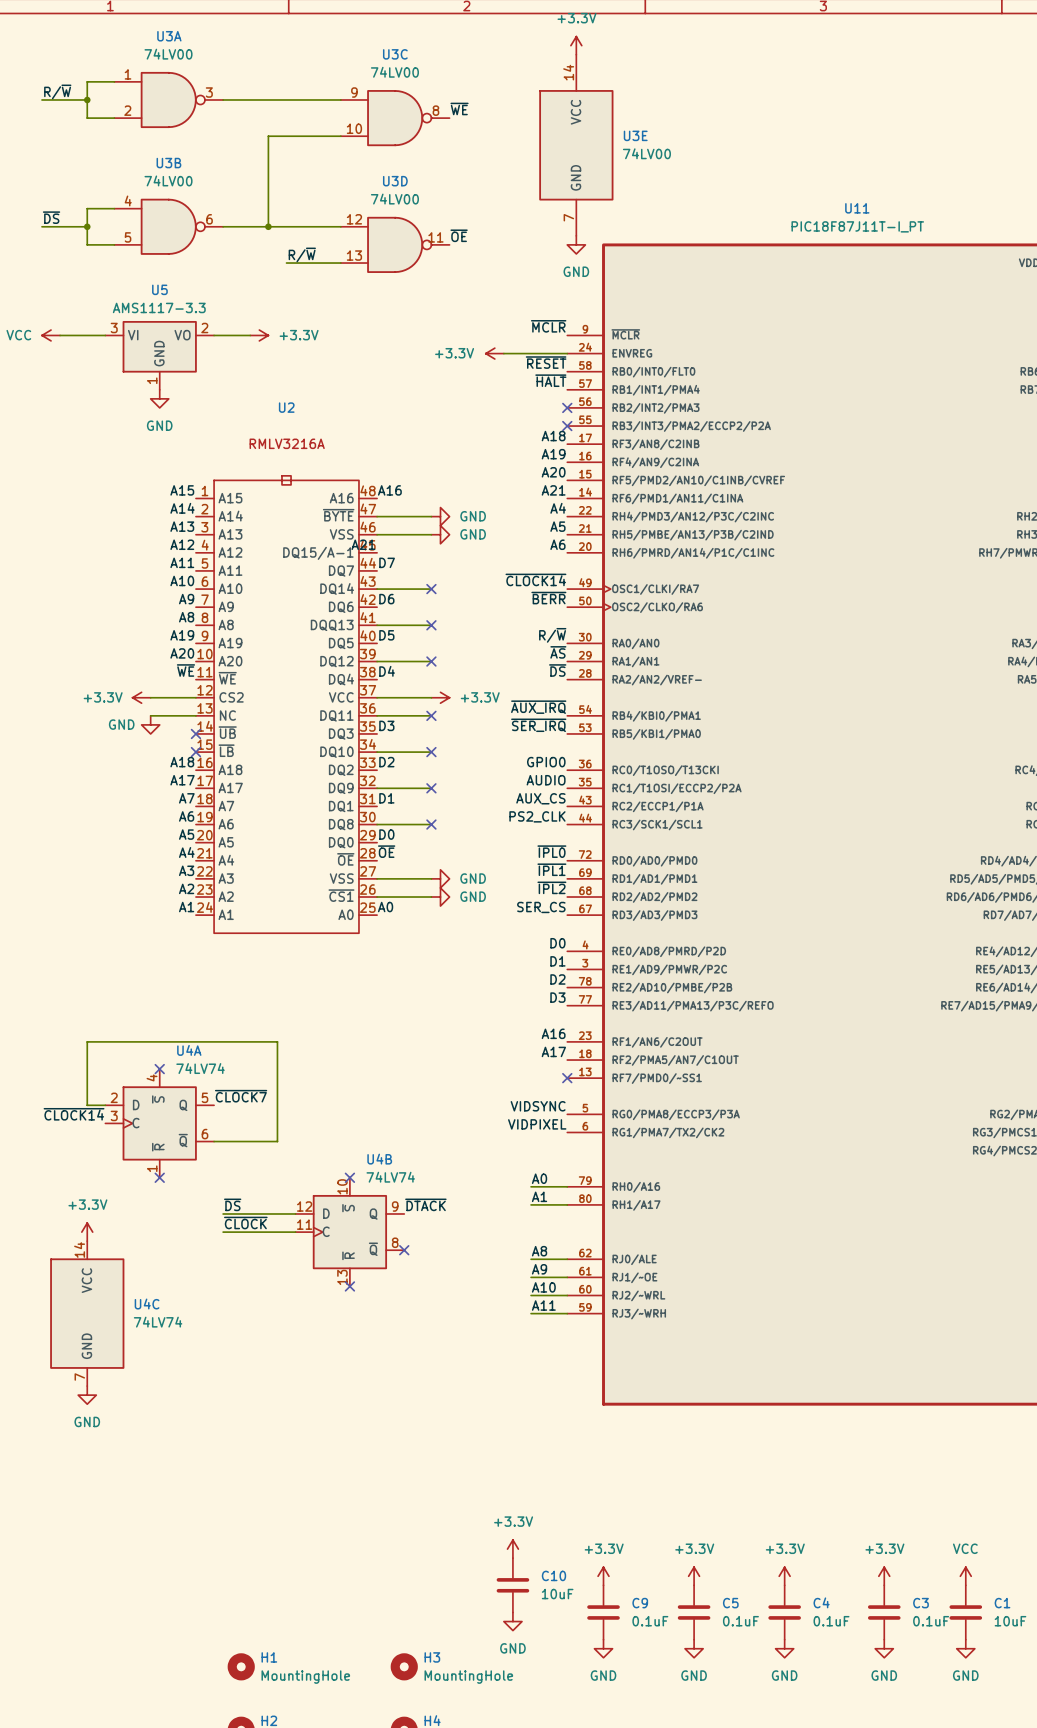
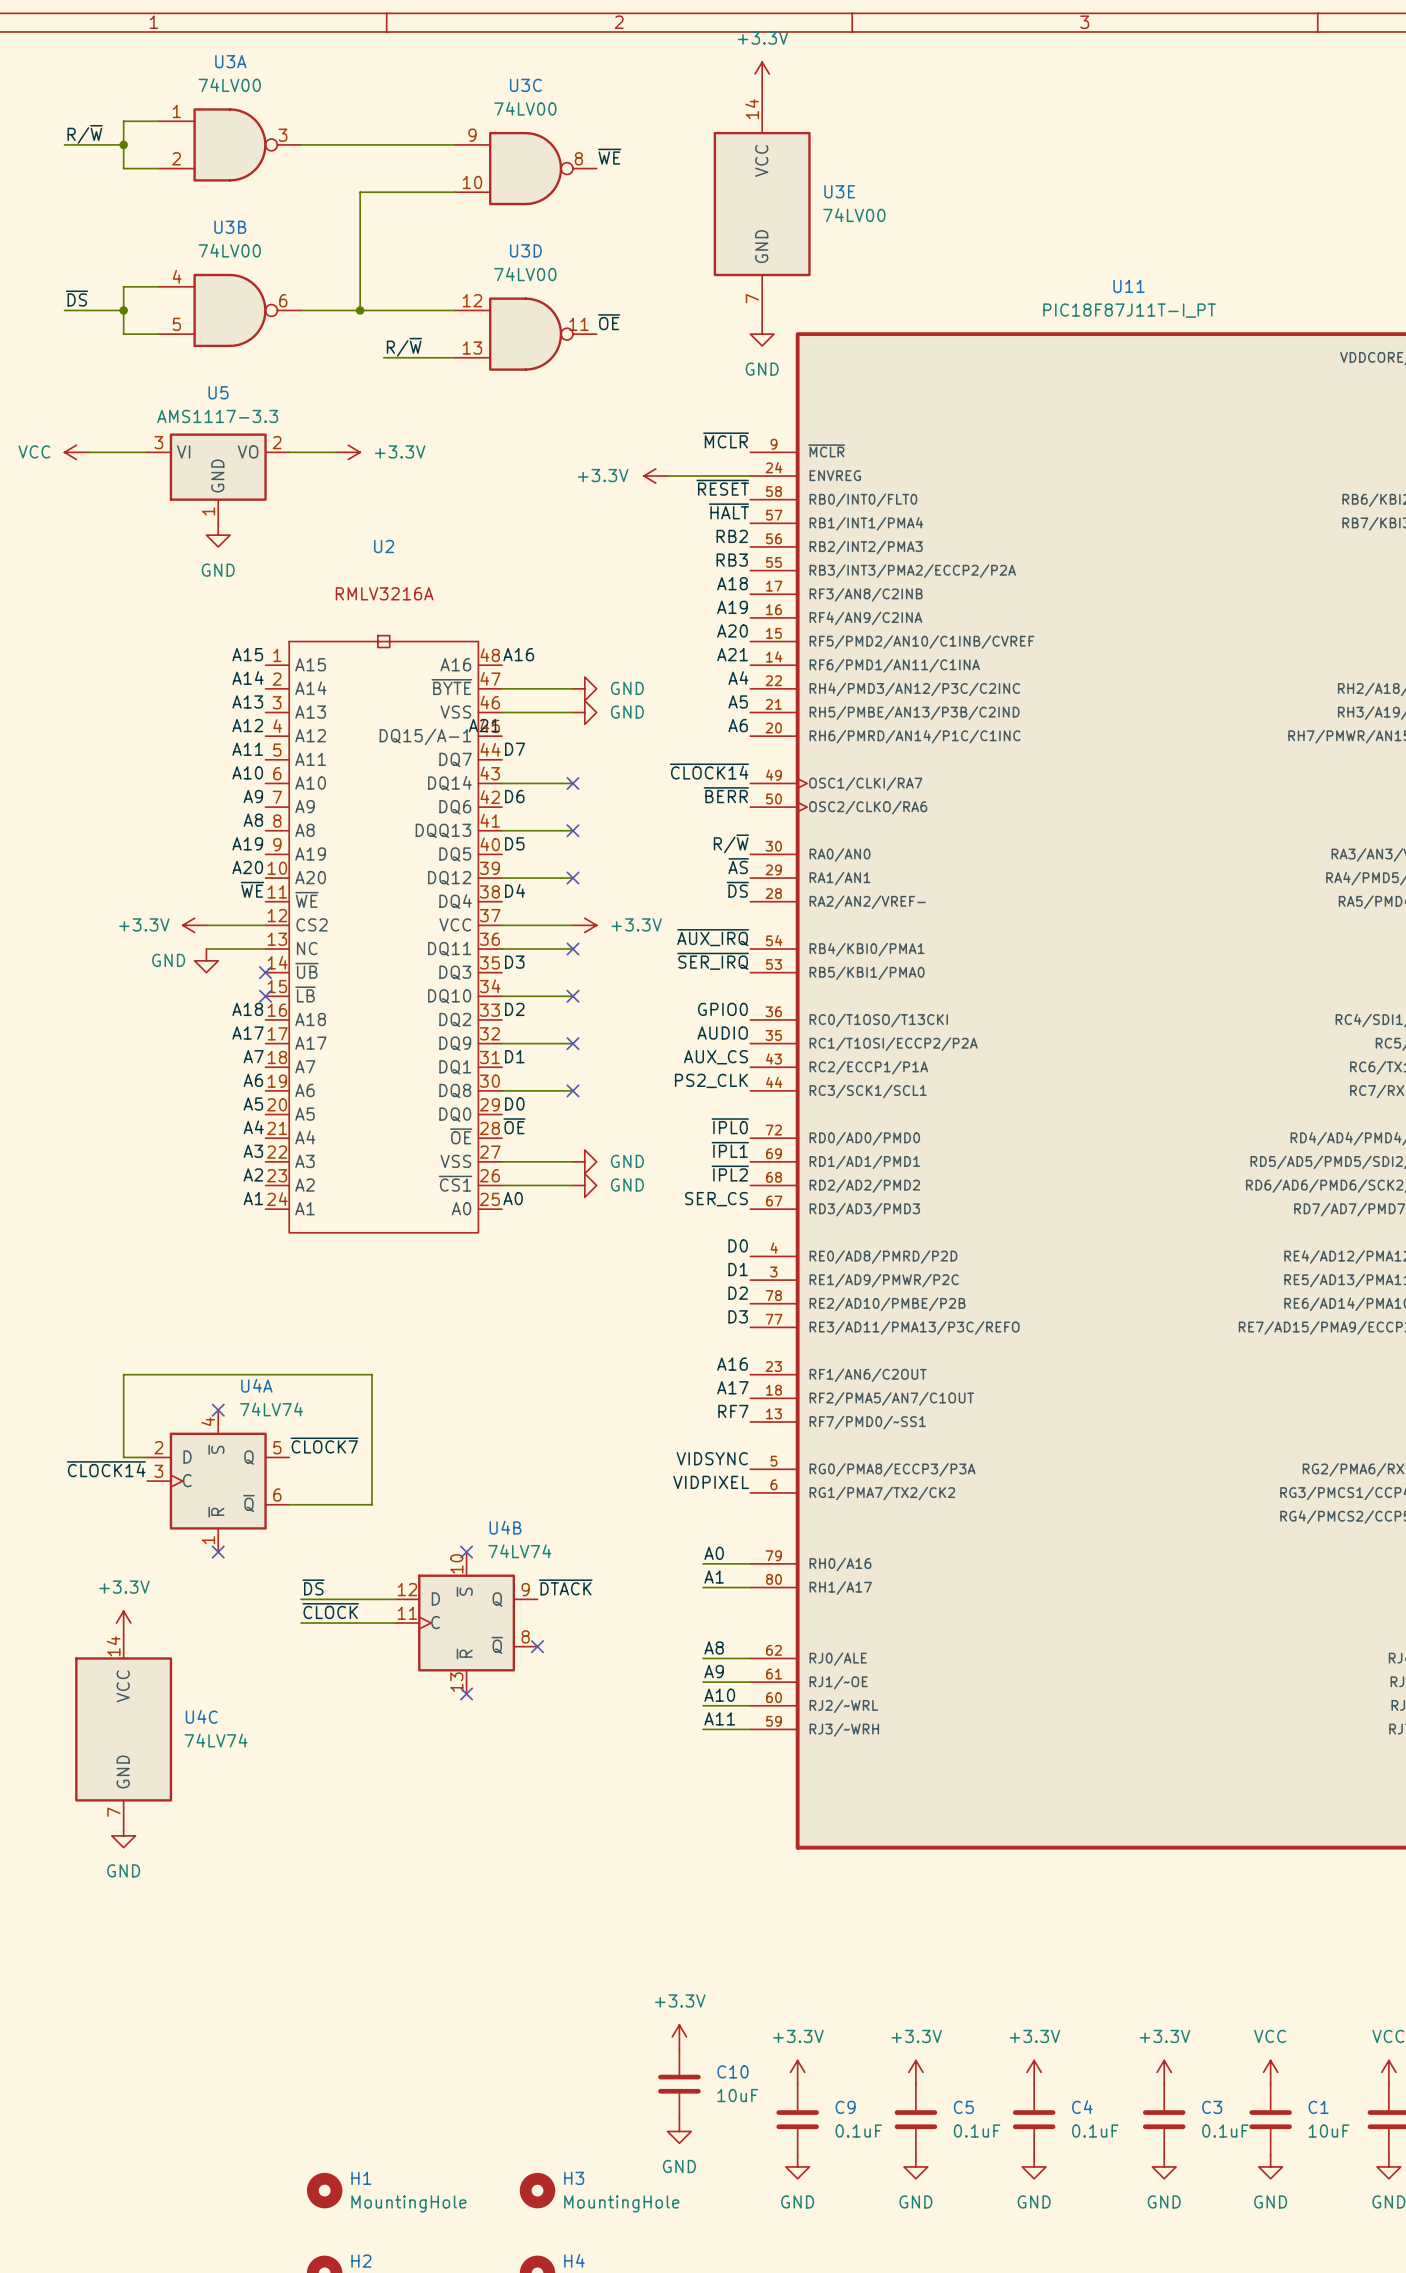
label: none -> RB2 (732, 536)
no-connect mark: (567, 407) -> none
label: none -> RB3 (732, 560)
no-connect mark: (567, 426) -> none
label: none -> RF7 (733, 1411)
no-connect mark: (567, 1078) -> none

